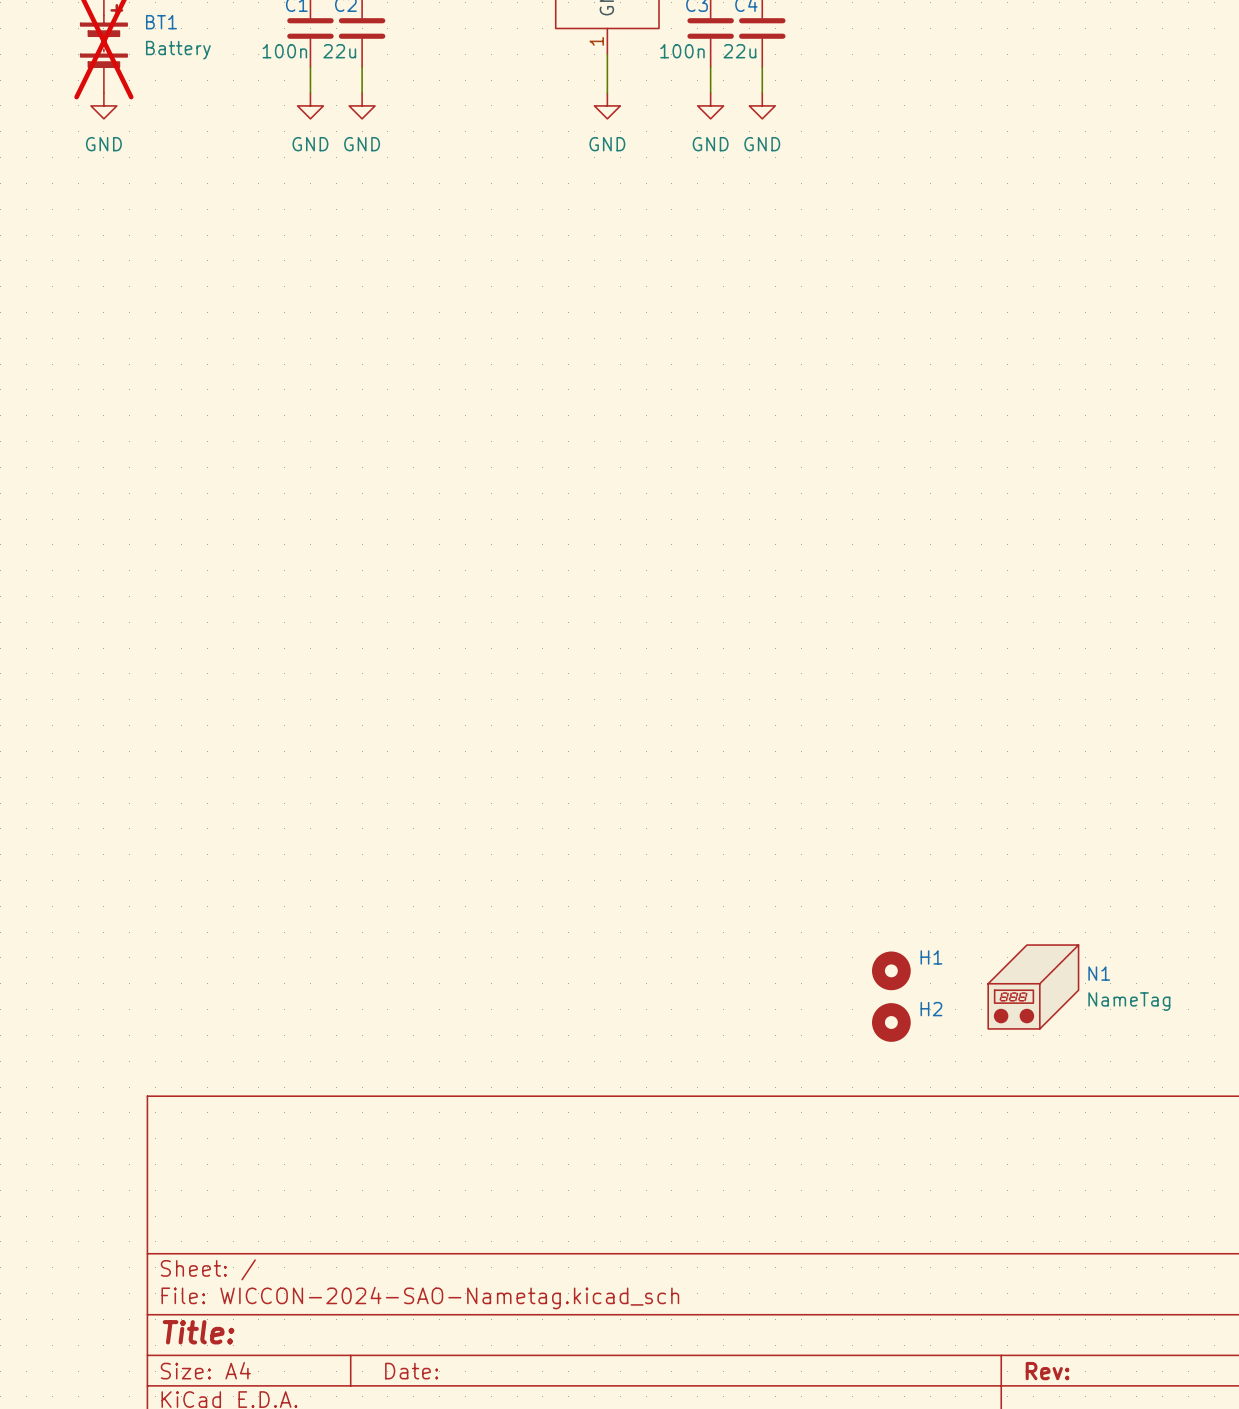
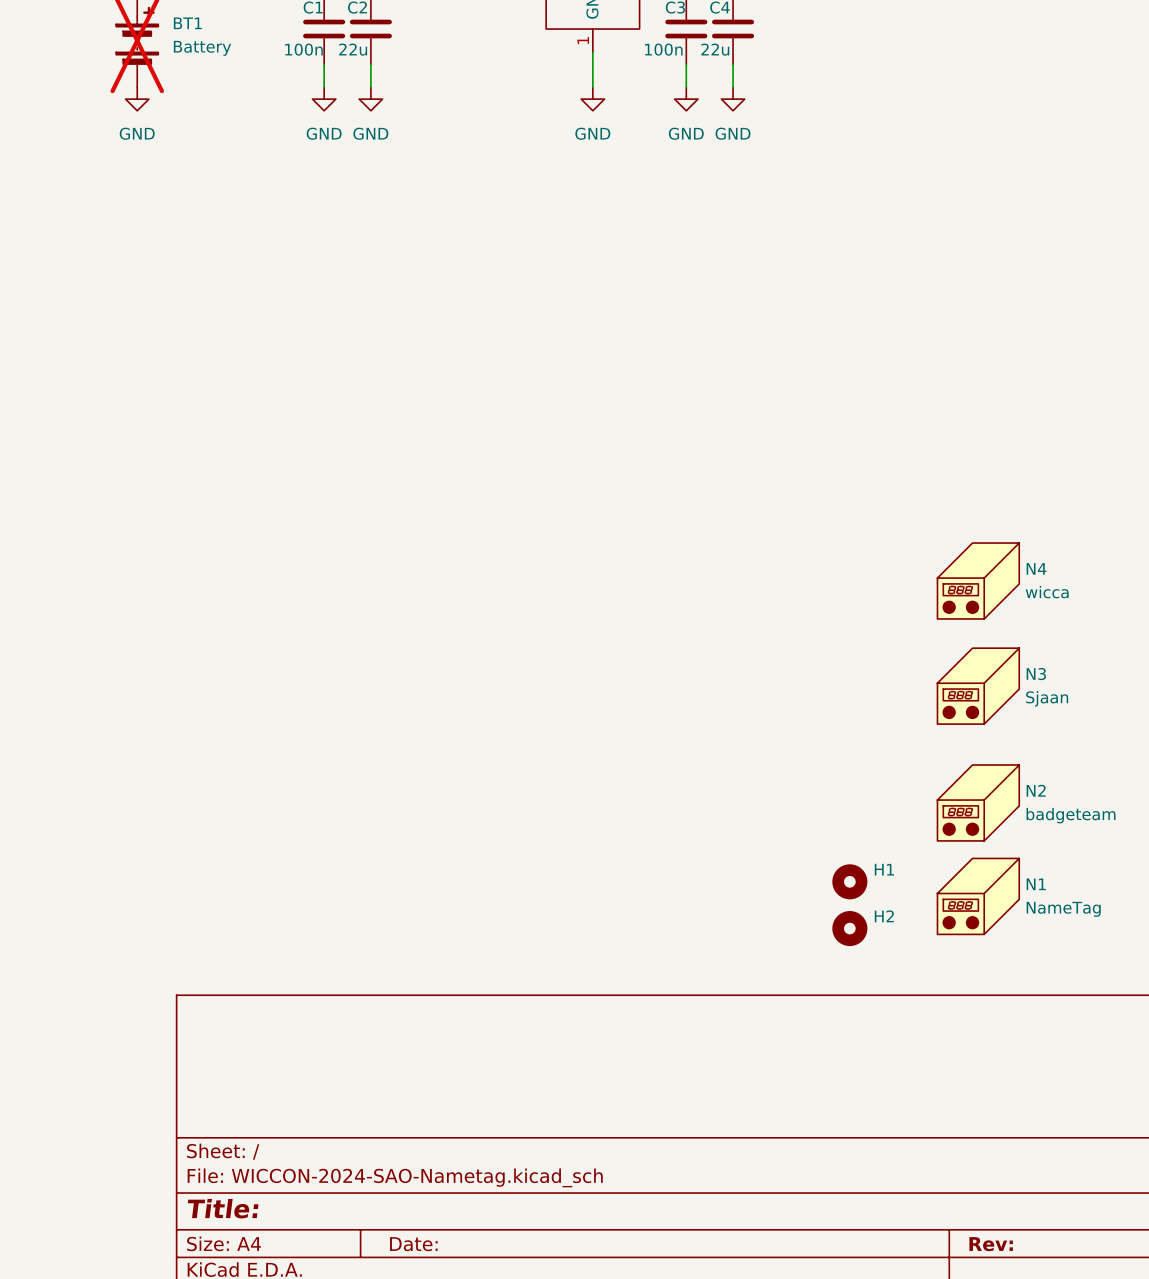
N4: none -> wicca (978, 581)
N3: none -> Sjaan (978, 686)
N2: none -> badgeteam (978, 802)

